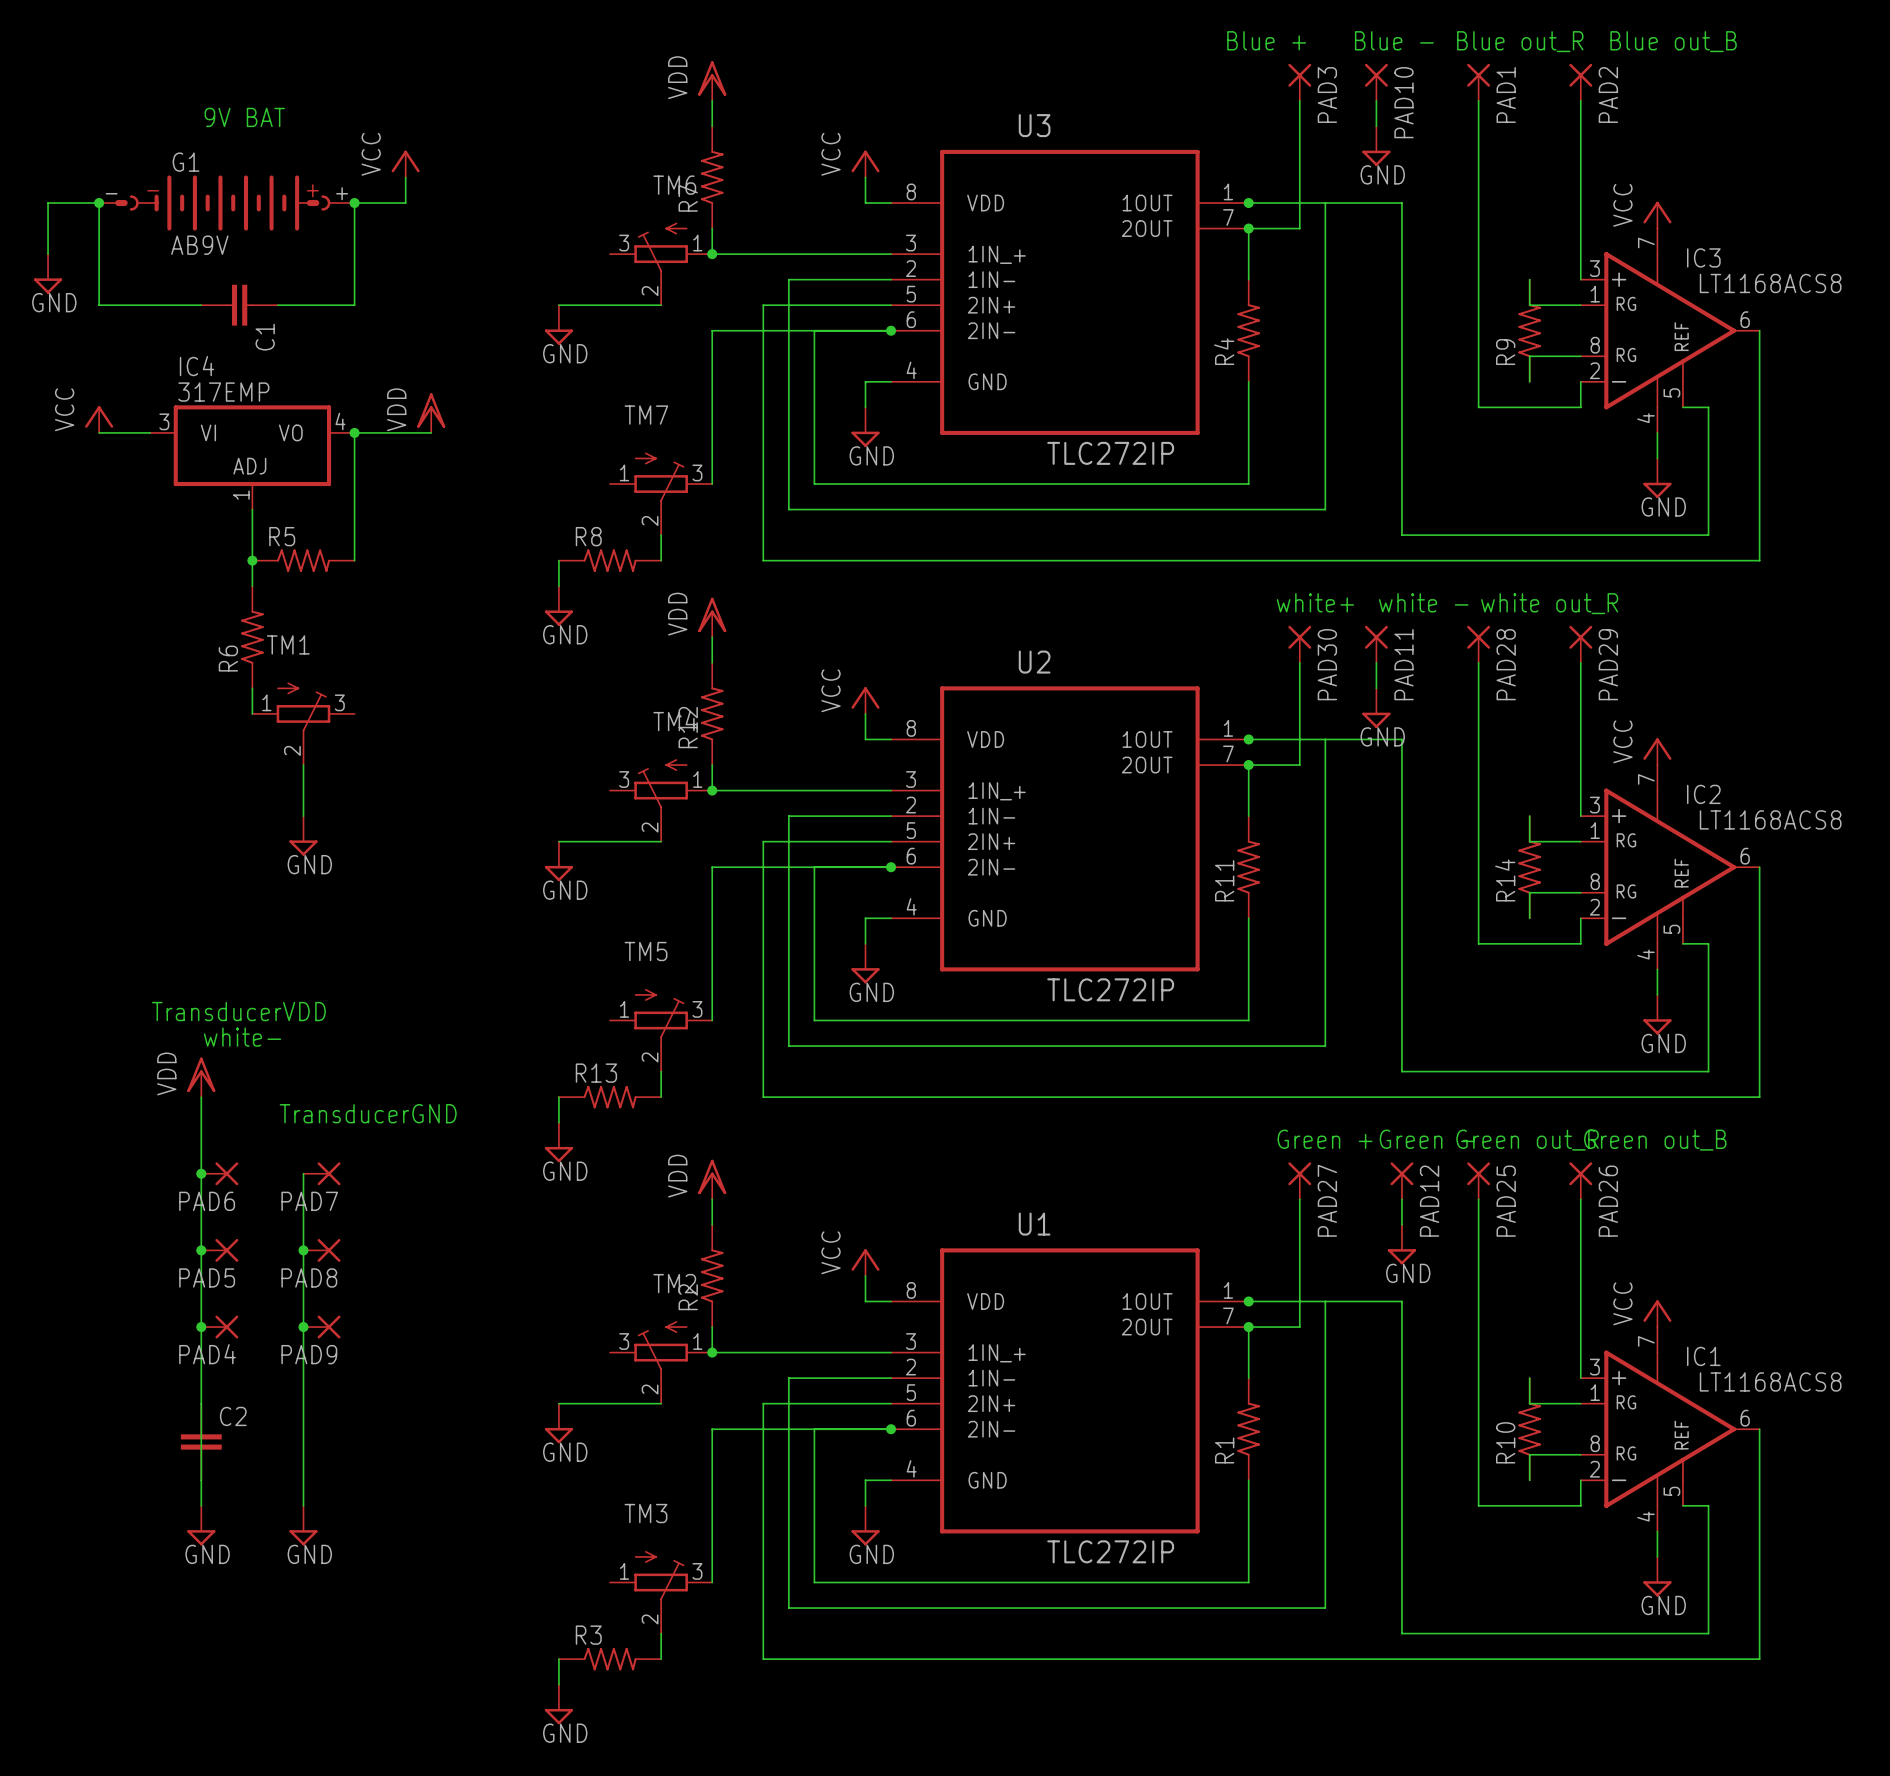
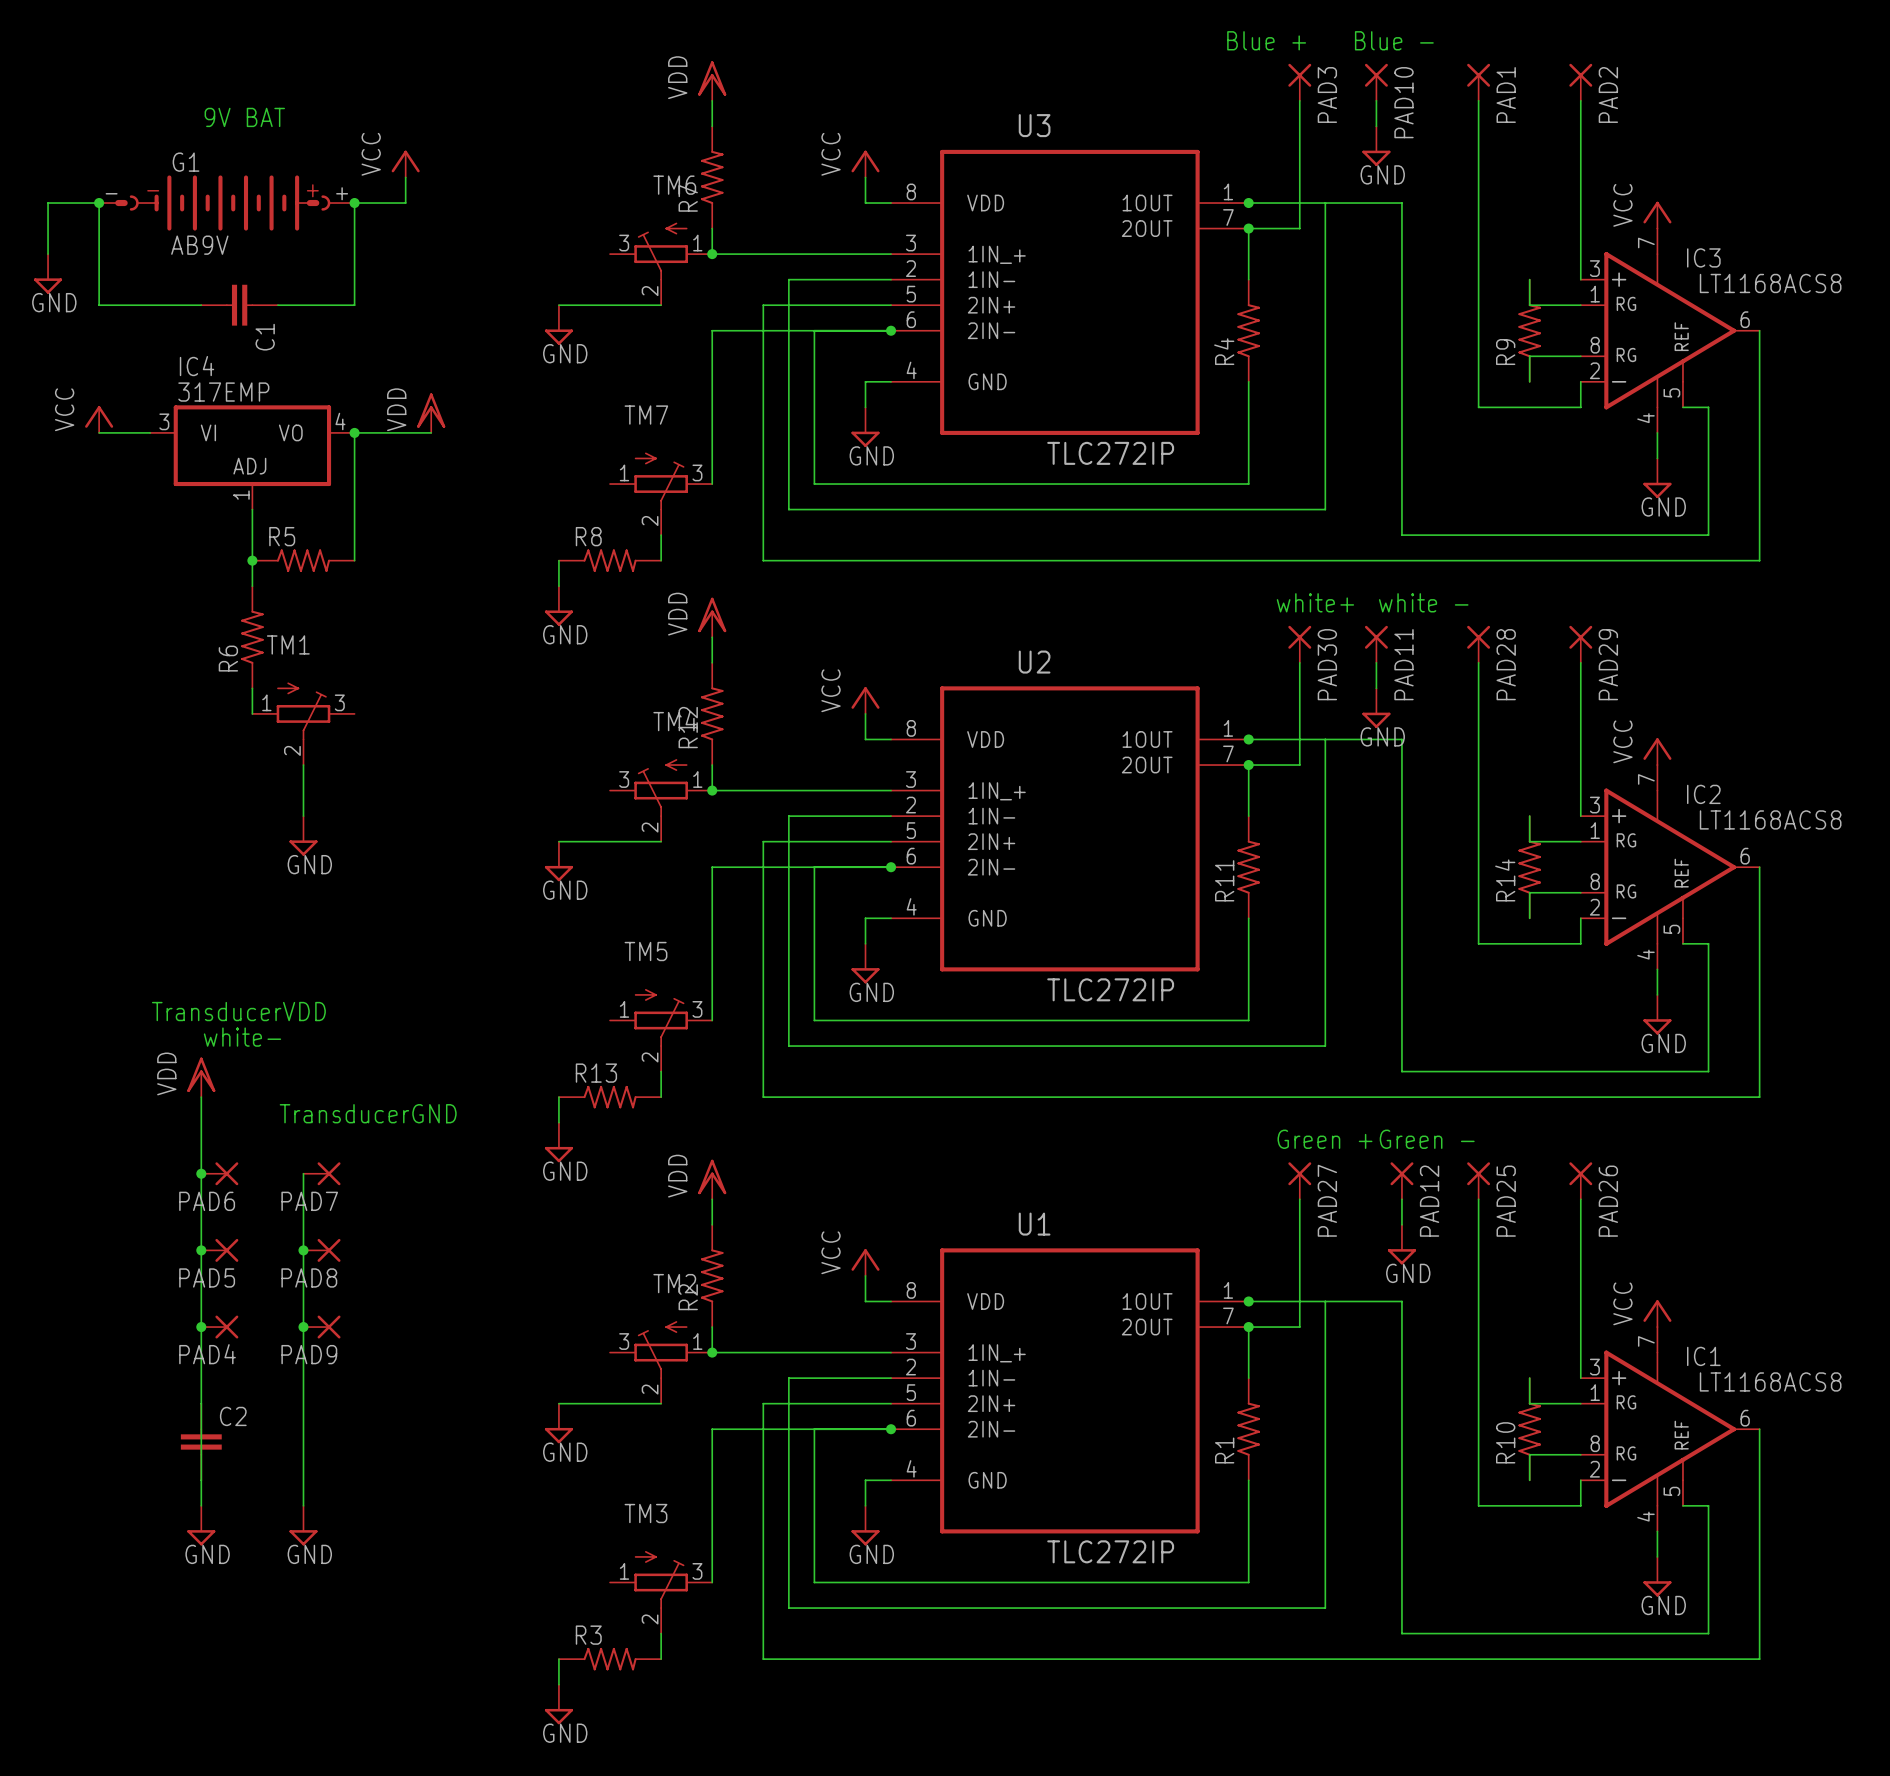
text: Blue out_R (1520, 41) -> none
text: Blue out_B (1673, 41) -> none
text: white out_R (1549, 603) -> none
text: Green out_R (1527, 1140) -> none
text: Green out_B (1655, 1140) -> none

